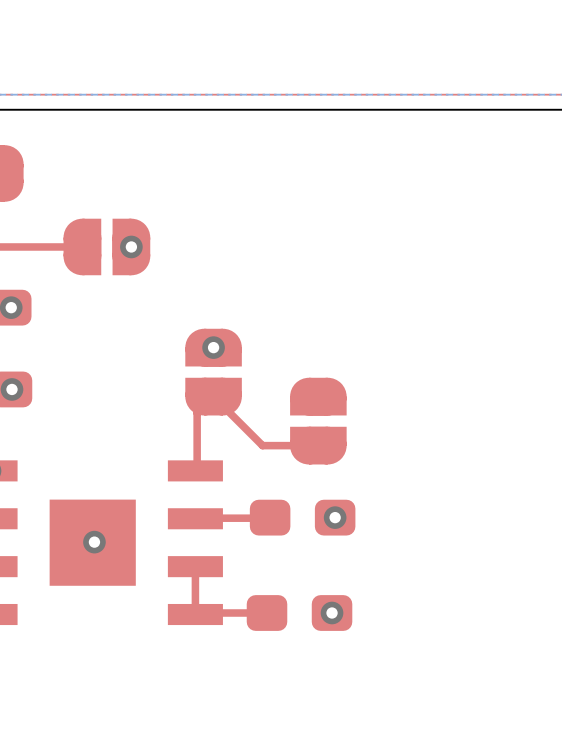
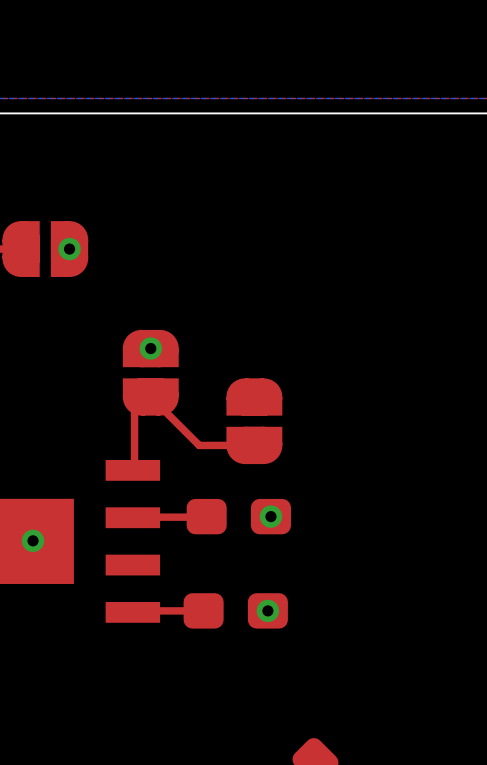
top track: (195, 566) (195, 614) -> none

